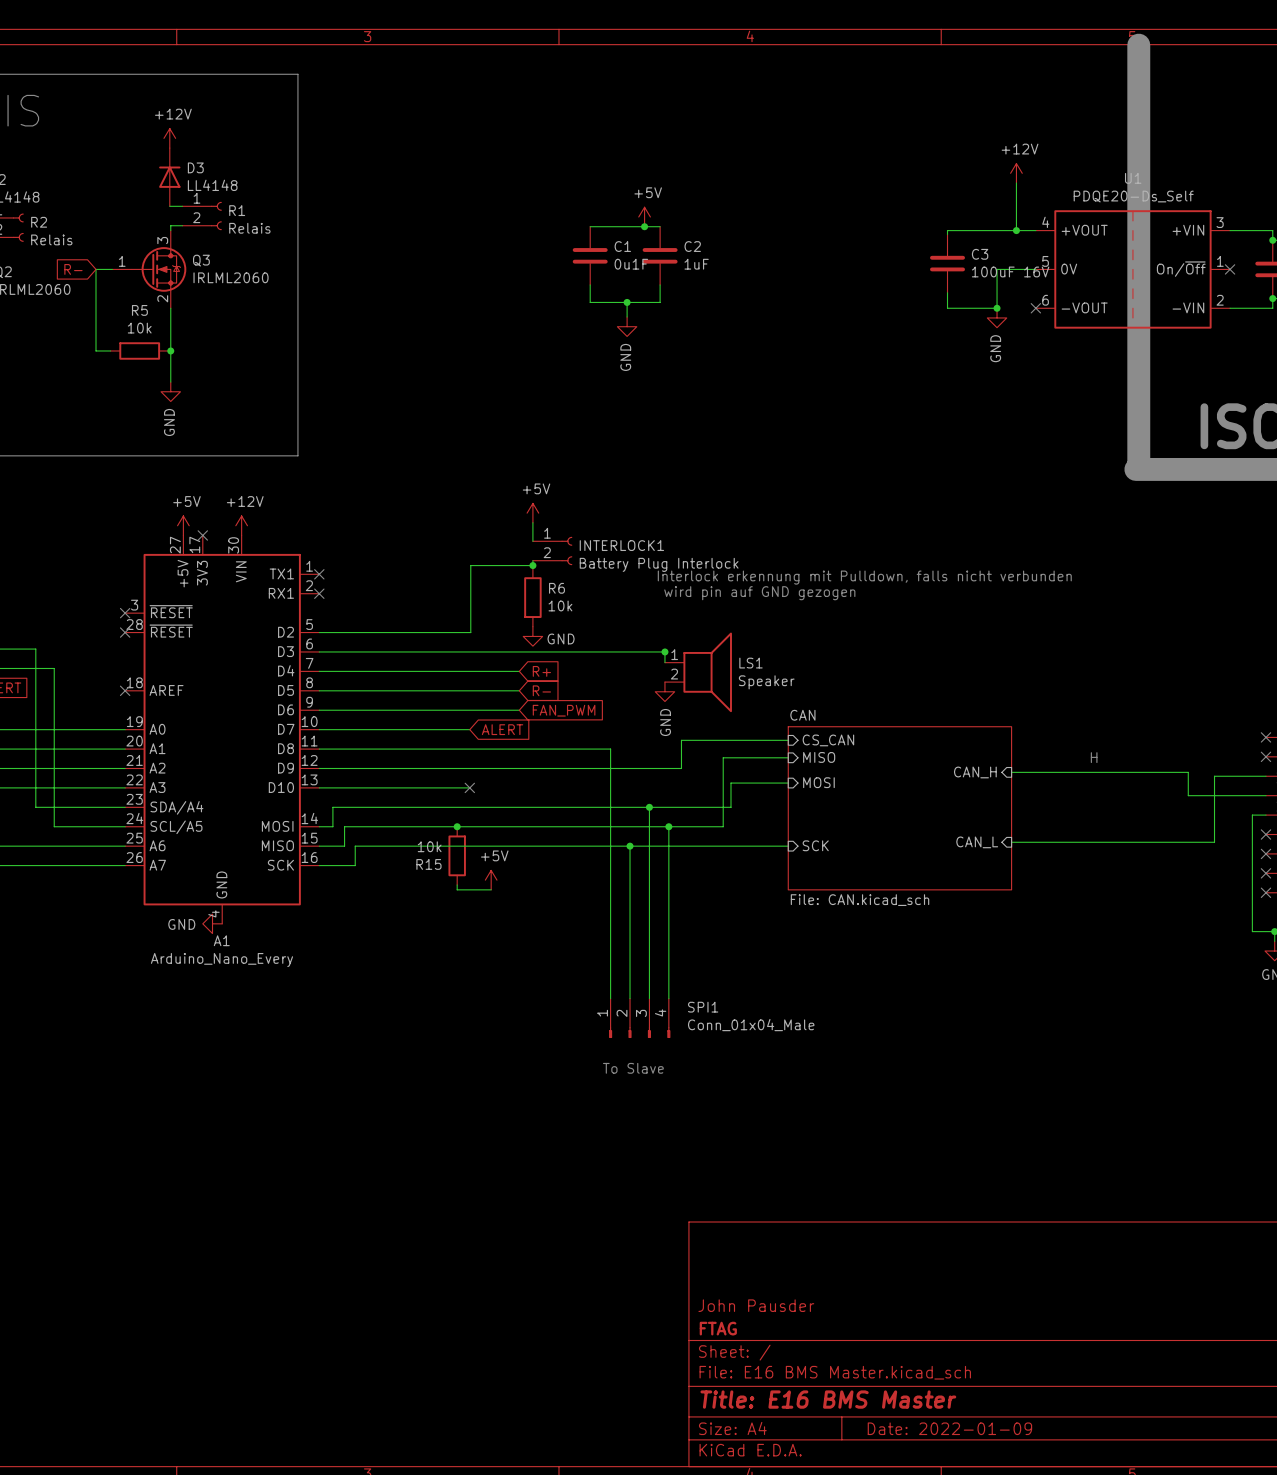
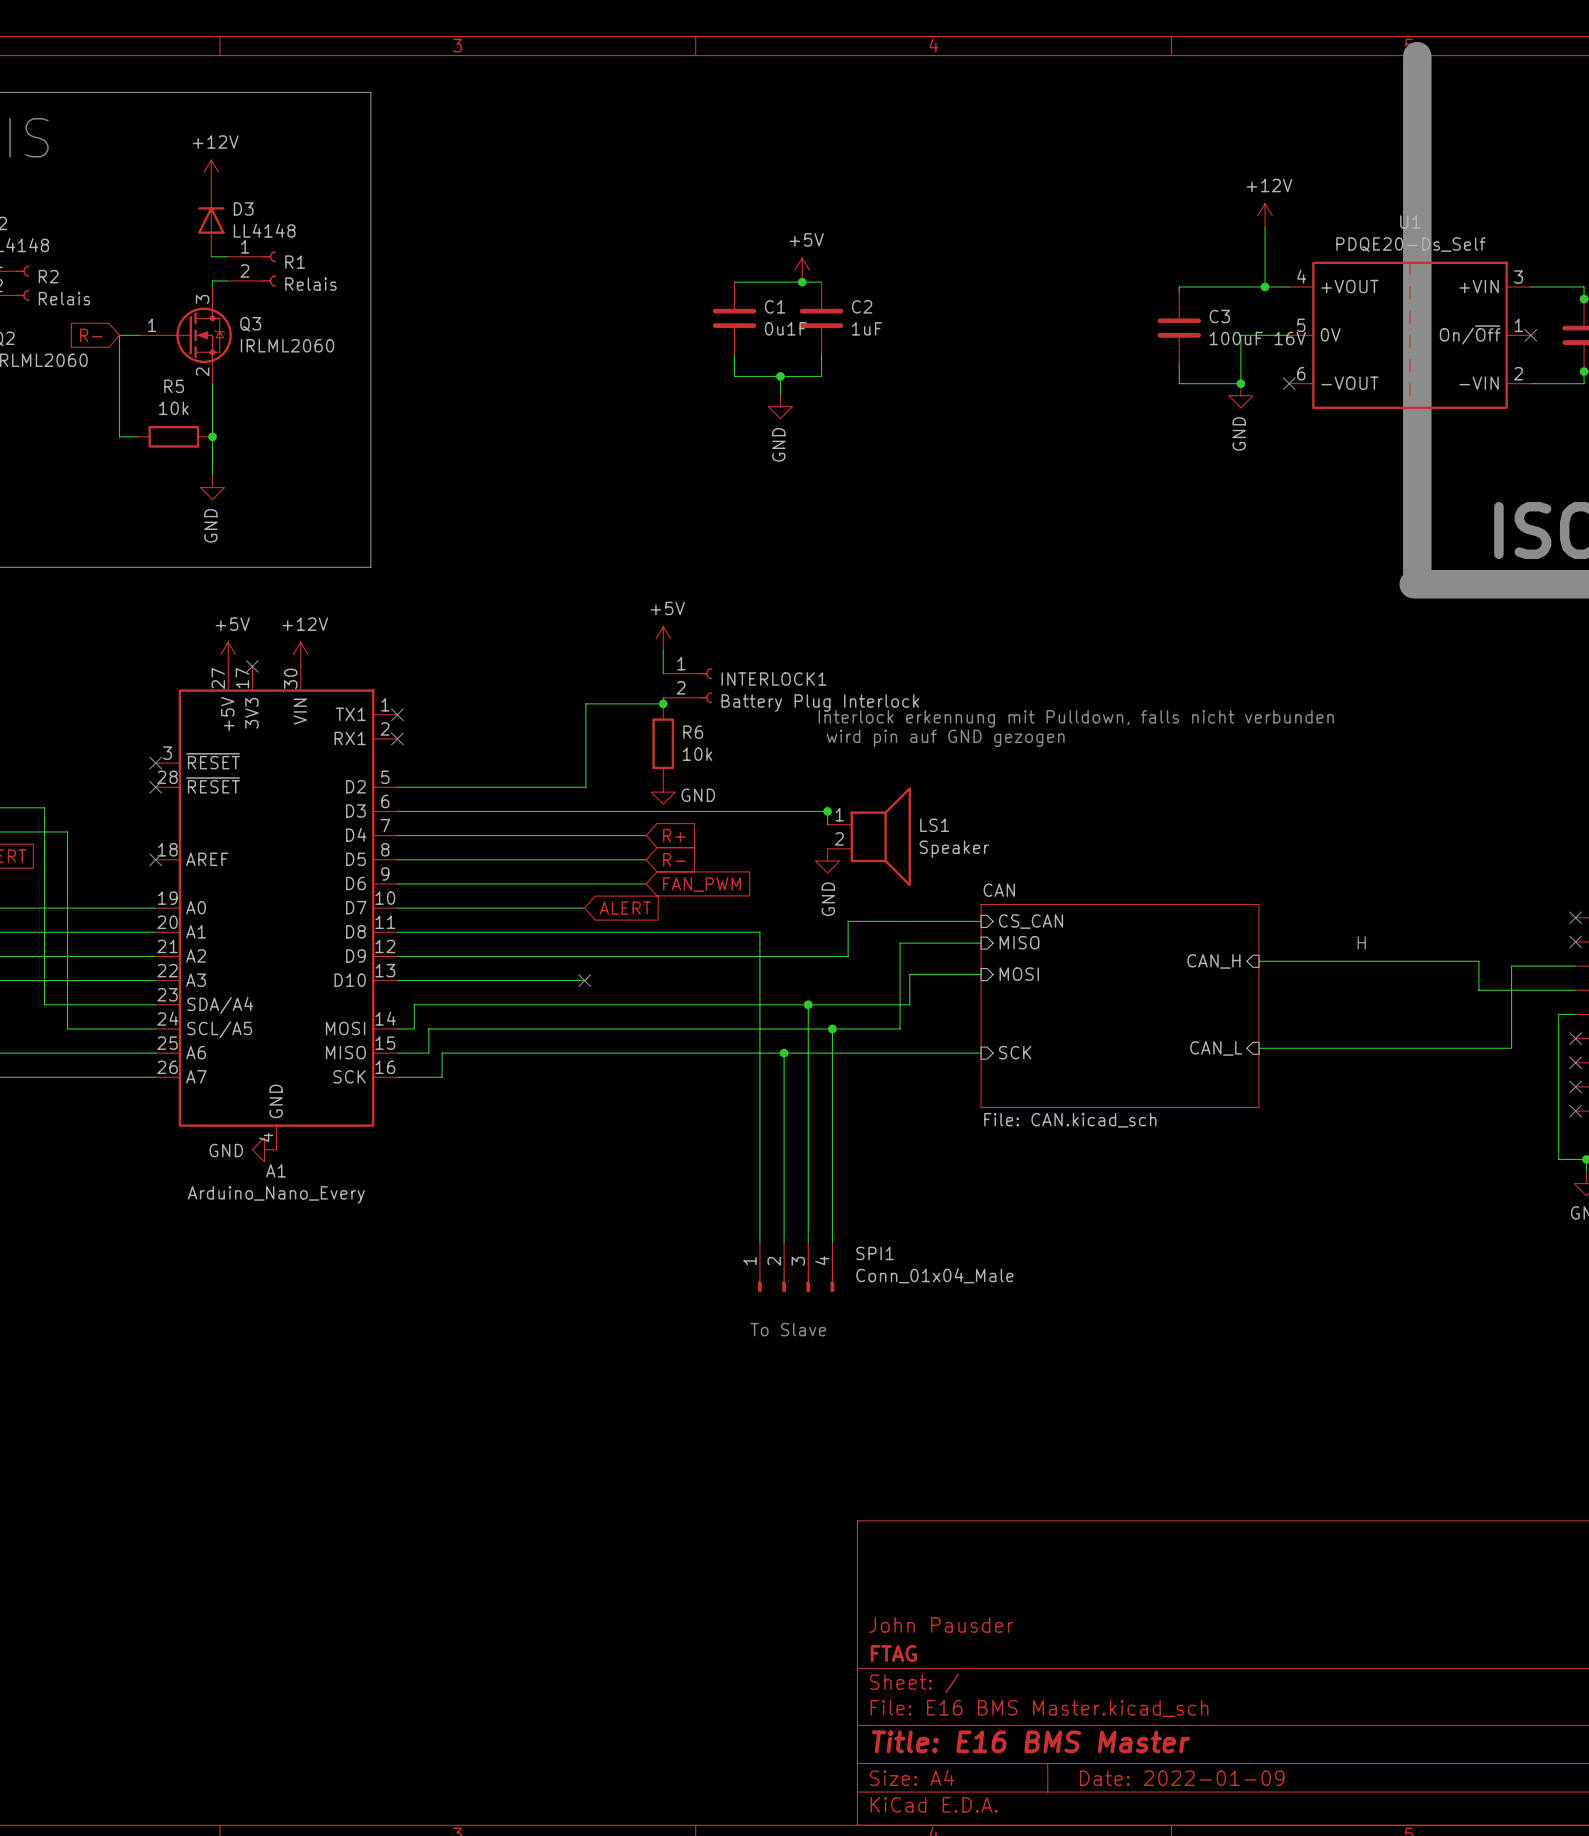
junction: (457, 826) -> none
R15: 10k (457, 855) -> none
power symbol: +5V (491, 880) -> none
wire: (457, 885) (457, 889) (491, 889) -> none

